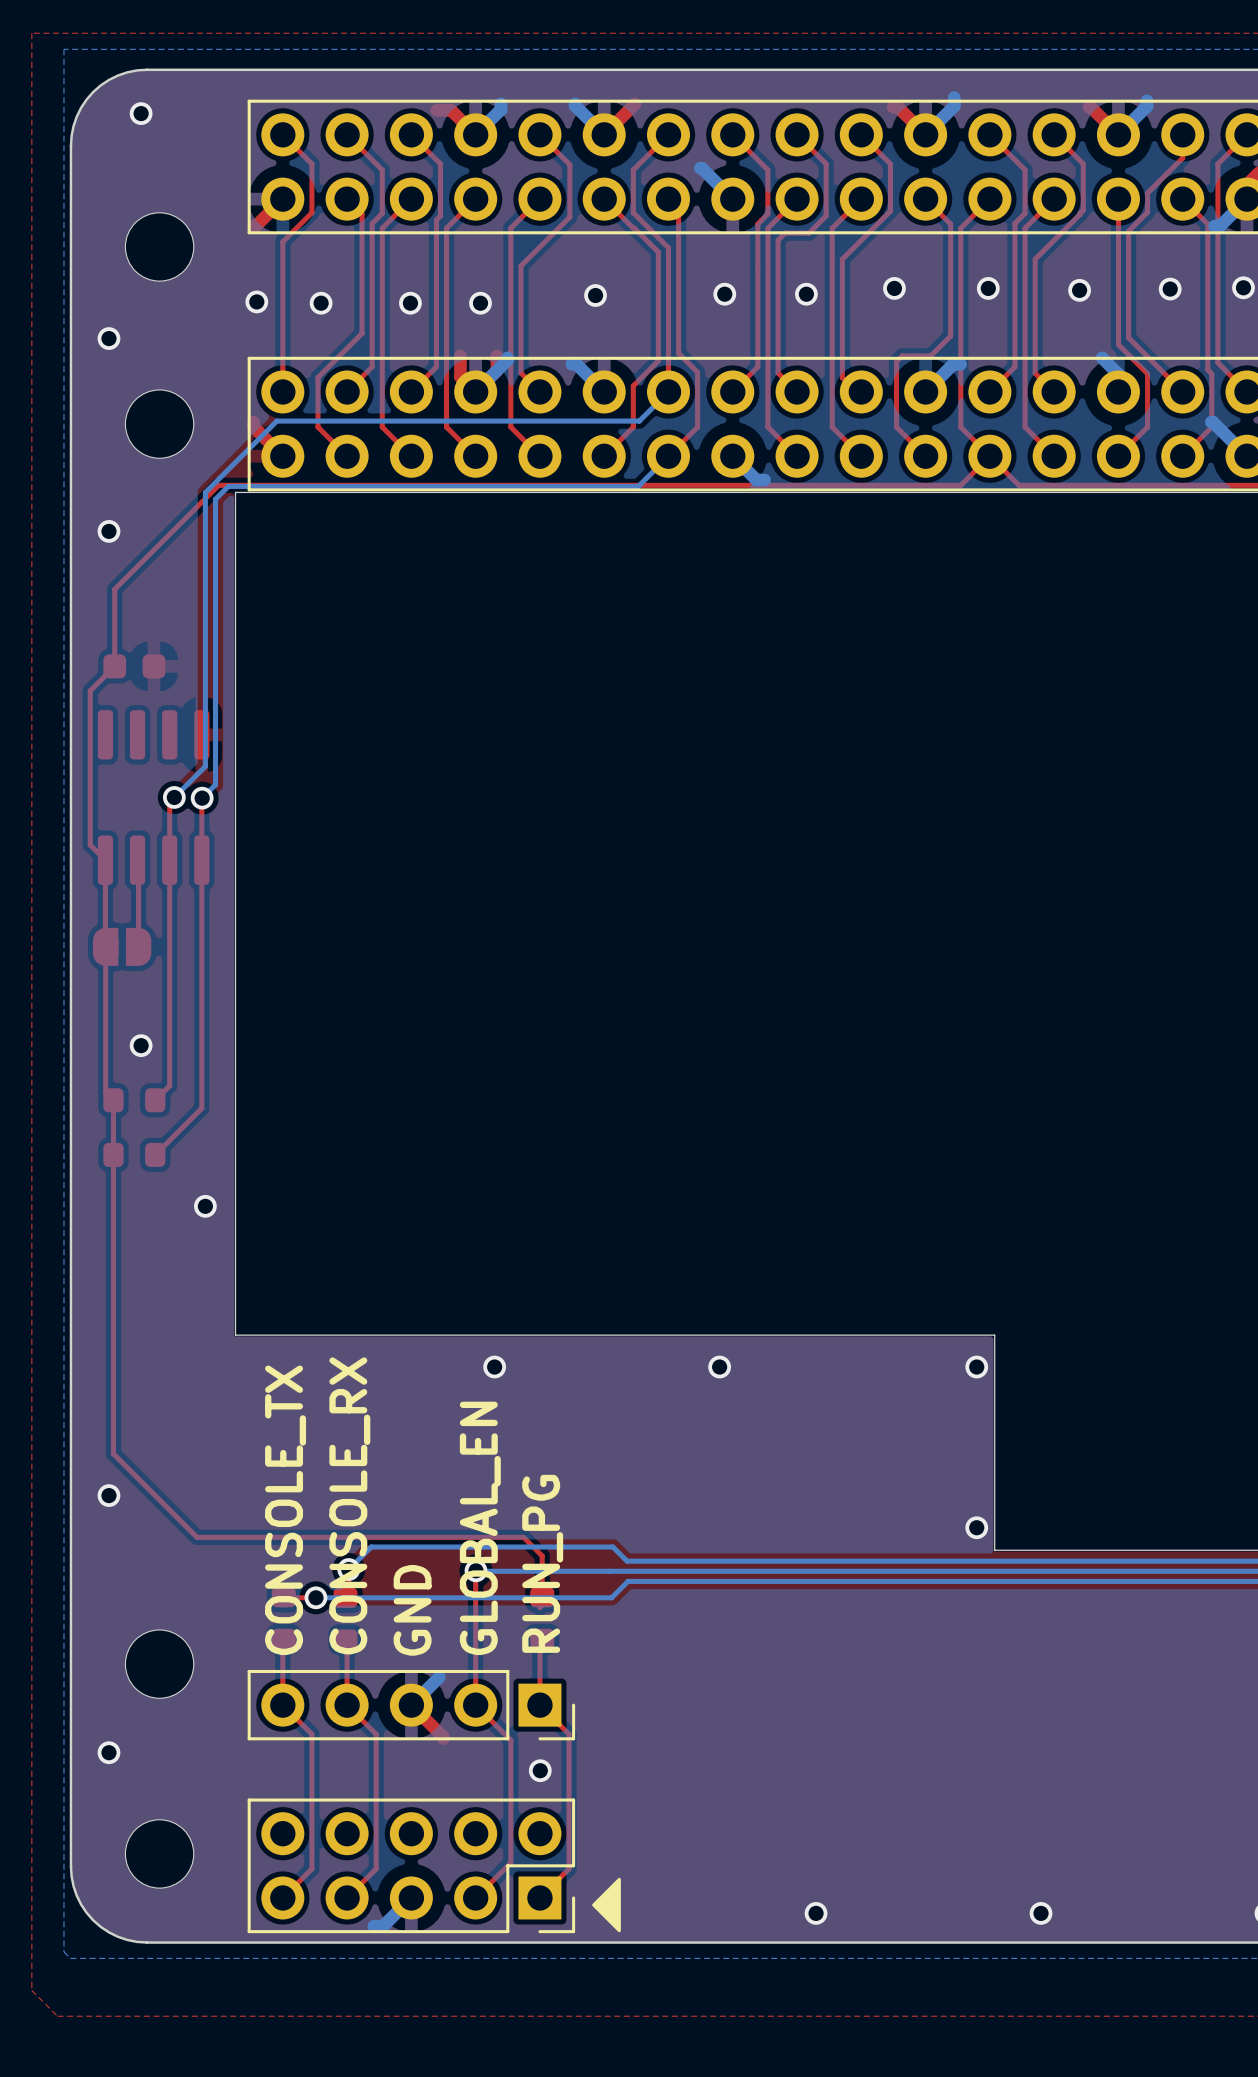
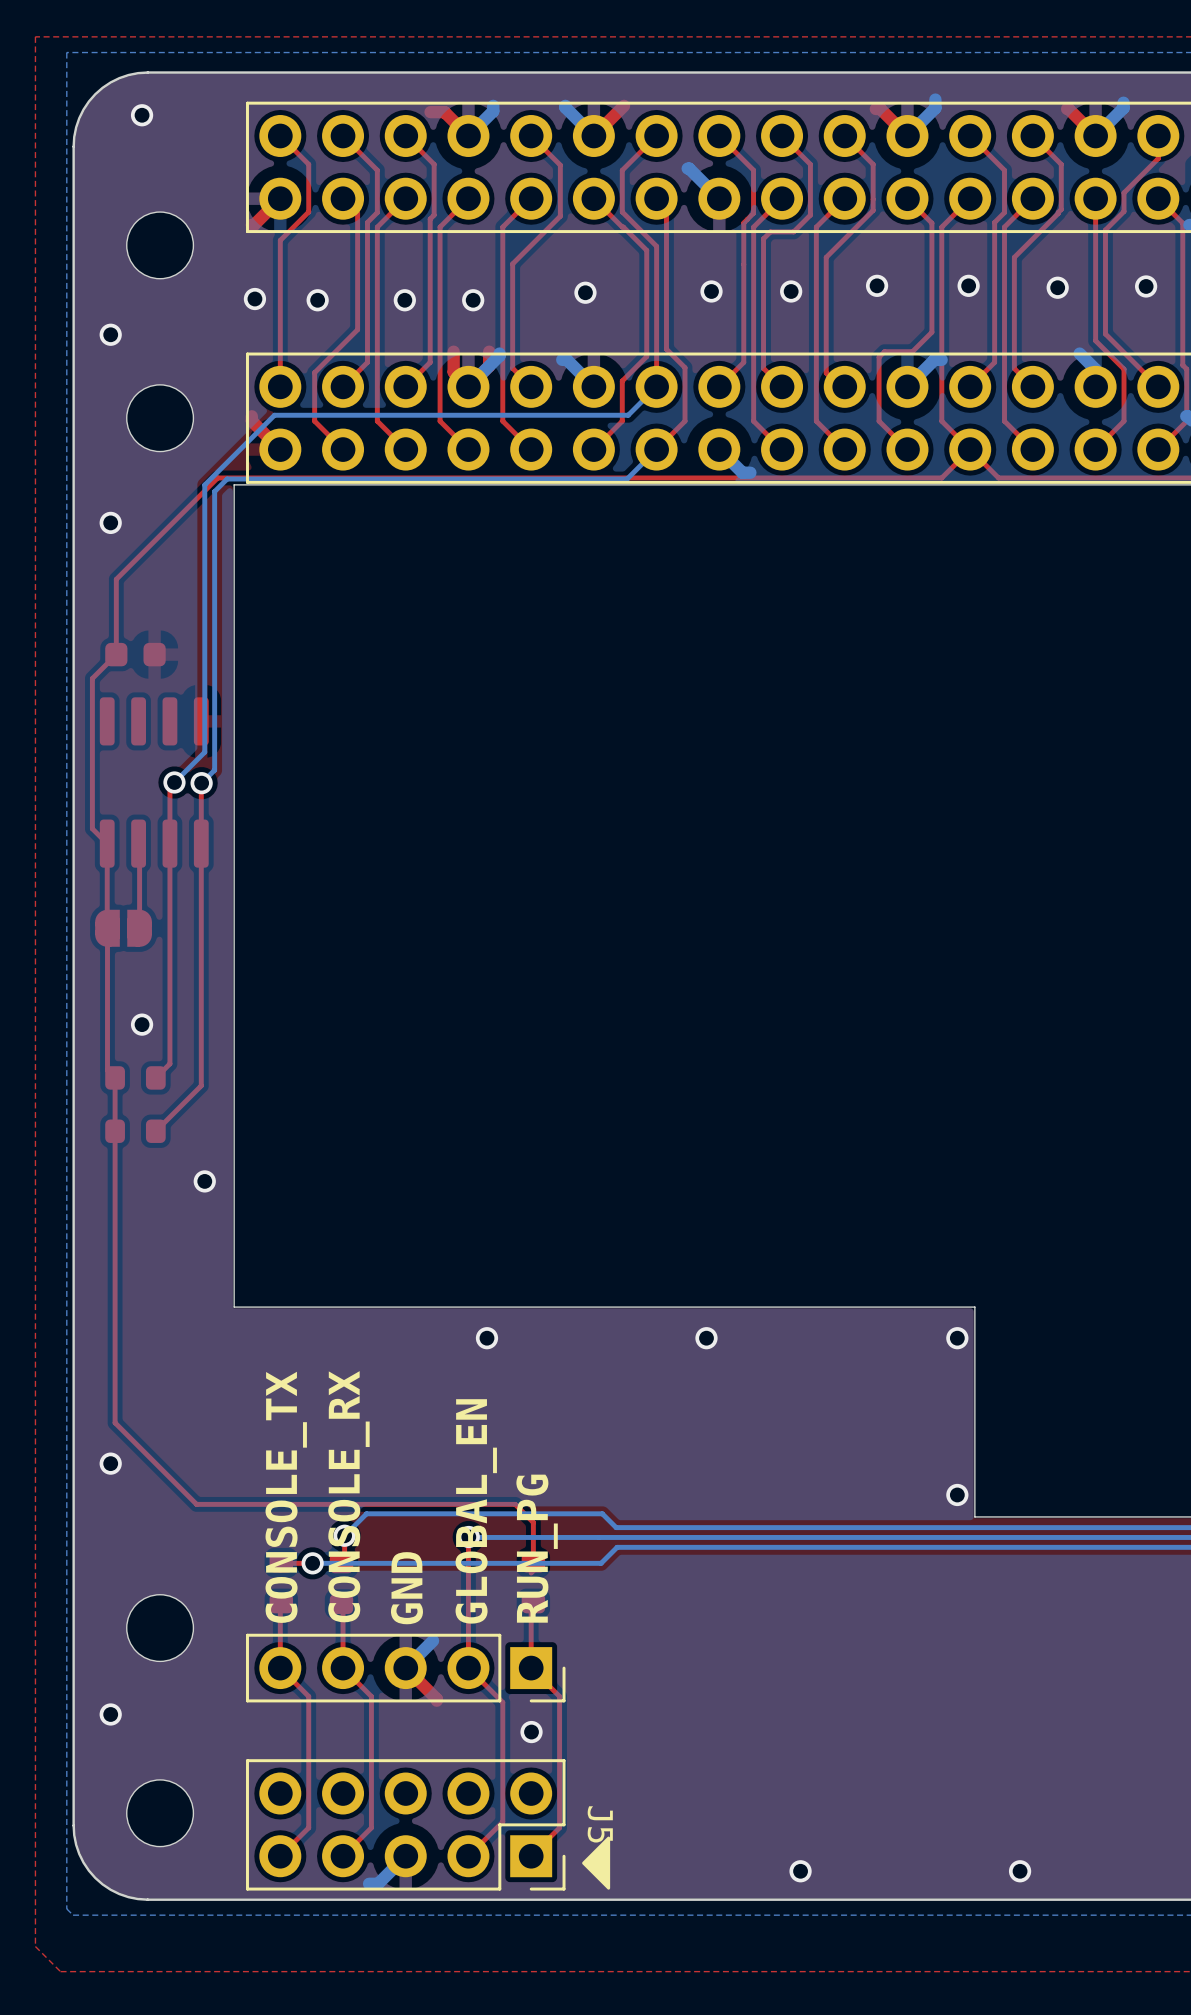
J5 name: none -> J5 (600, 1824)

